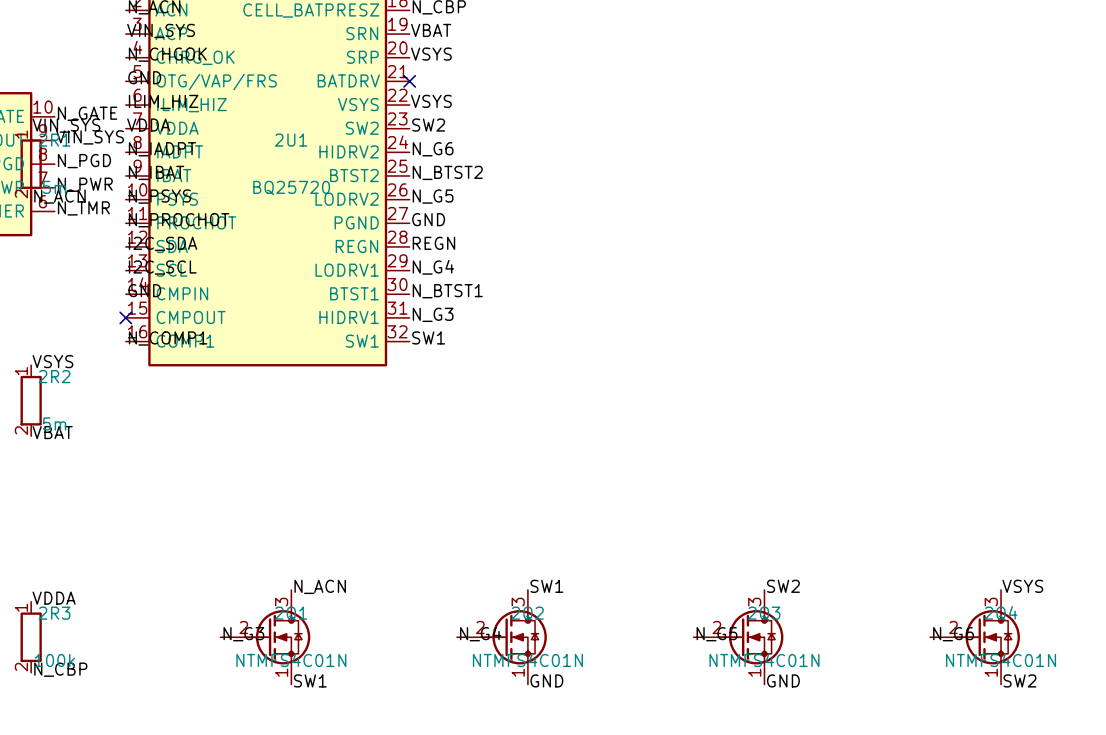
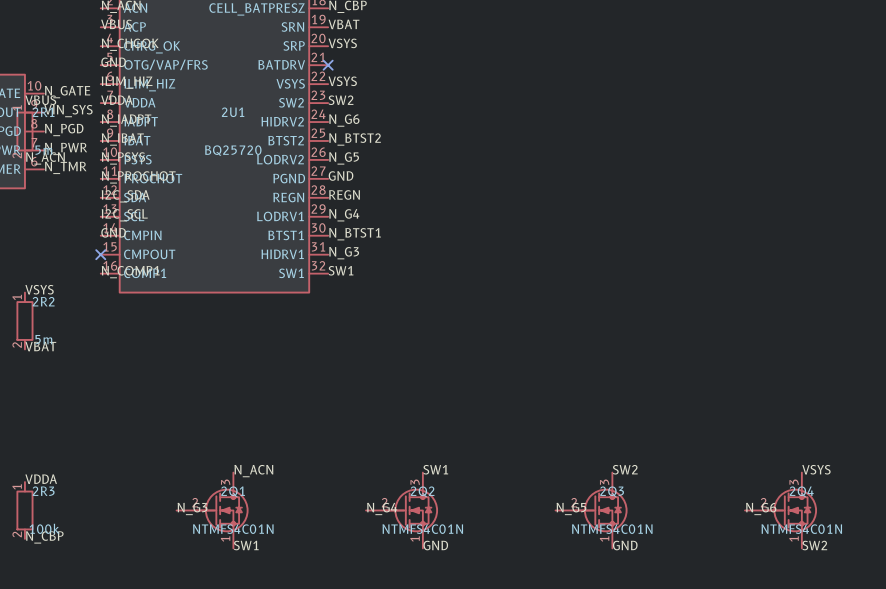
label: VIN_SYS (161, 30) -> VBUS (116, 24)
label: VIN_SYS (66, 125) -> VBUS (40, 100)

